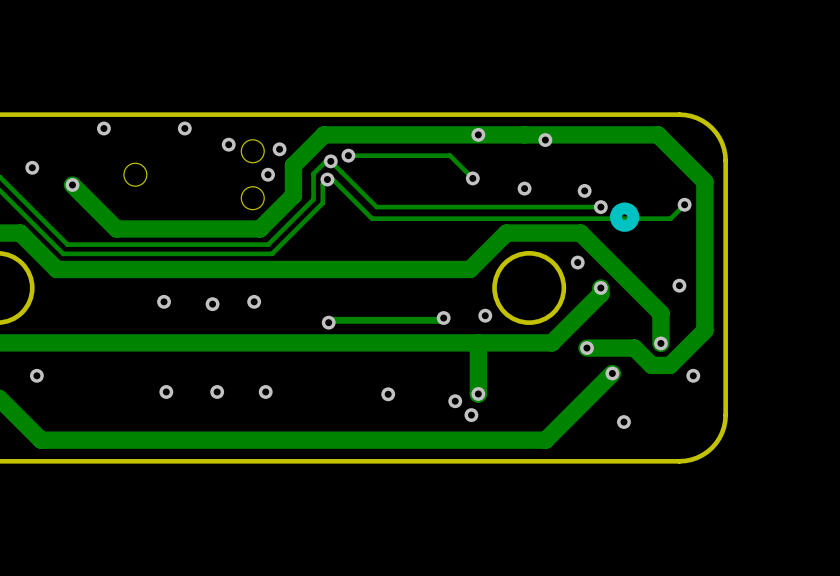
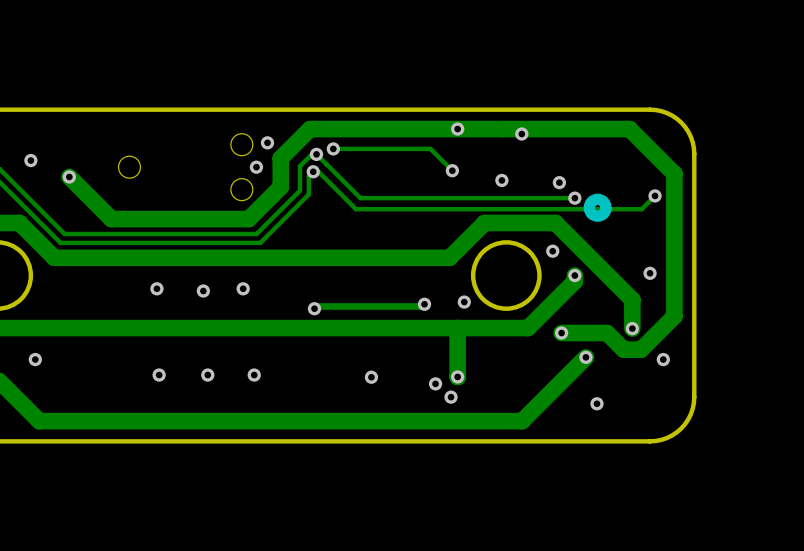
via: (103, 128) -> none
via: (184, 128) -> none
via: (228, 144) -> none

